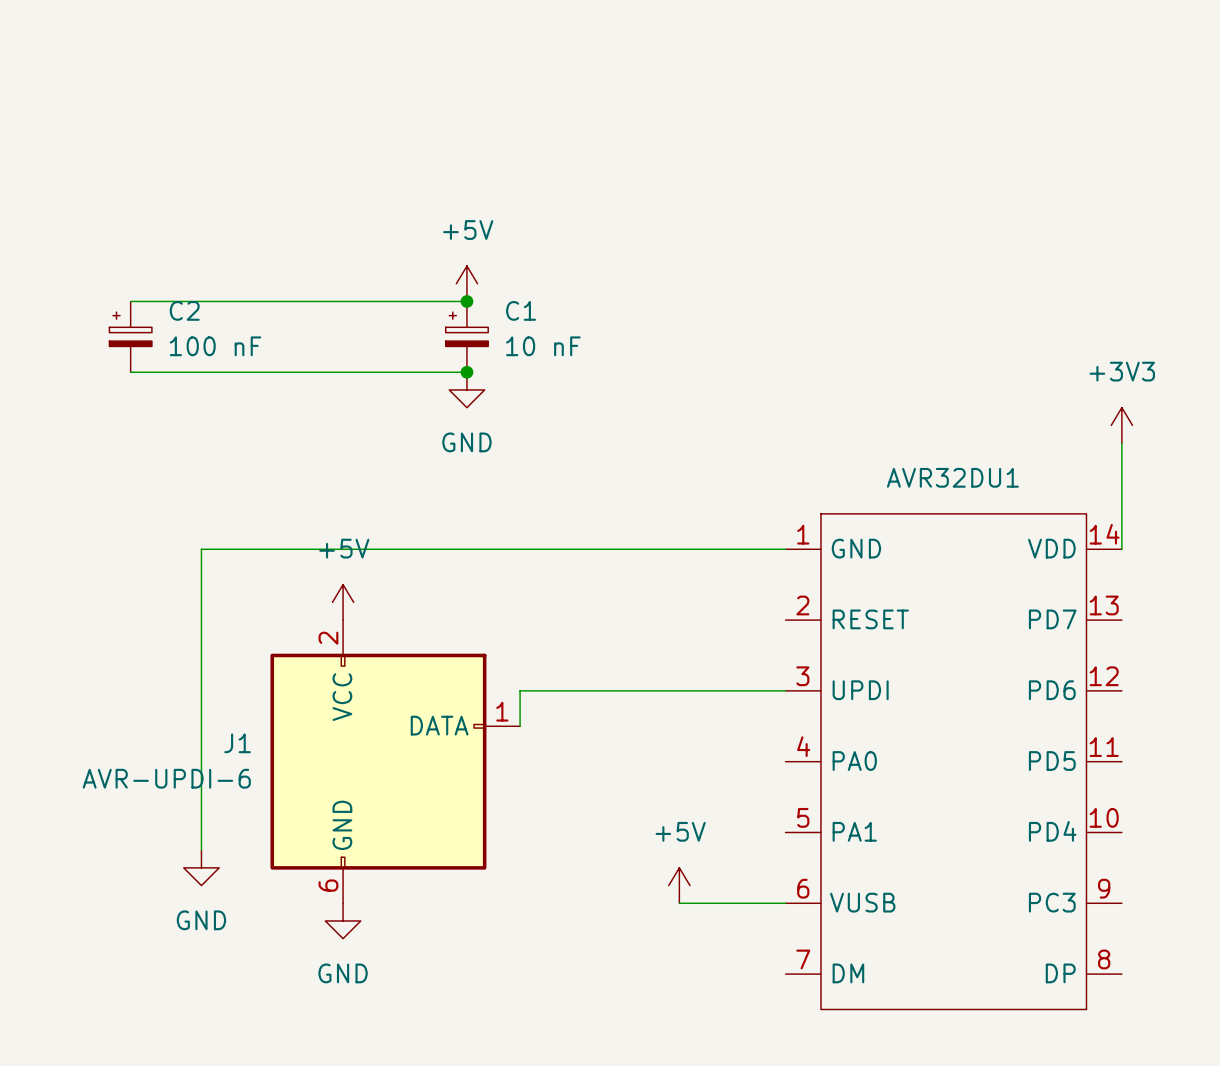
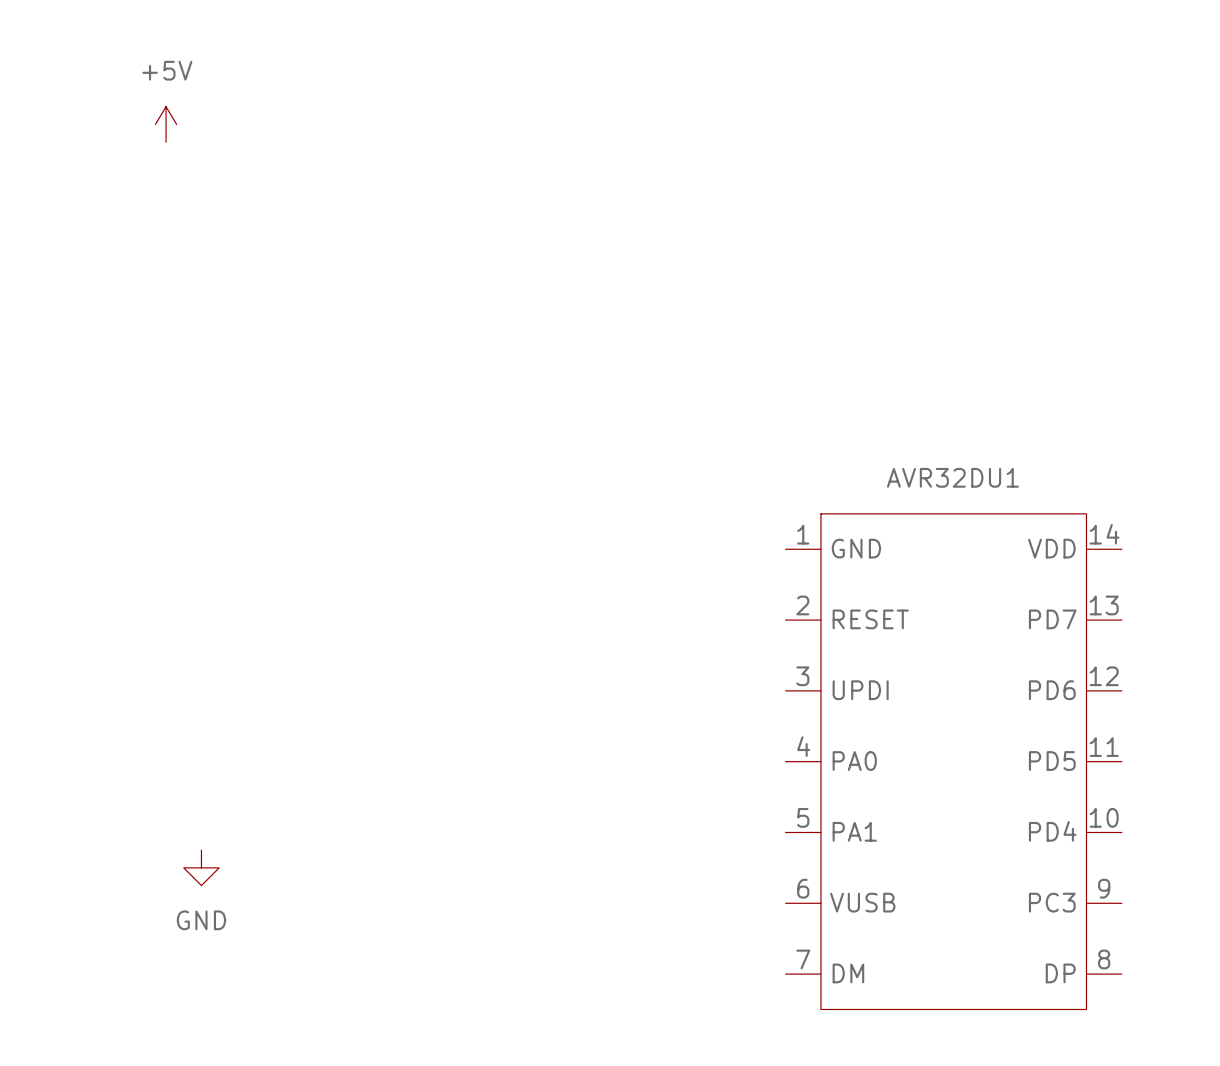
power symbol: none -> +5V (166, 124)
power symbol: +5V (466, 283) -> none
wire: (130, 301) (466, 301) -> none
junction: (466, 301) -> none
C2: 100 nF (130, 336) -> none
C1: 10 nF (466, 336) -> none
wire: (130, 372) (466, 372) -> none
junction: (466, 372) -> none
power symbol: GND (466, 389) -> none
power symbol: +3V3 (1121, 425) -> none
wire: (1121, 443) (1121, 549) -> none
wire: (785, 549) (201, 549) (201, 850) -> none
power symbol: +5V (343, 602) -> none
wire: (785, 690) (520, 690) (520, 726) -> none
J1: AVR-UPDI-6 (395, 761) -> none
power symbol: +5V (679, 885) -> none
wire: (679, 903) (785, 903) -> none
power symbol: GND (343, 920) -> none

